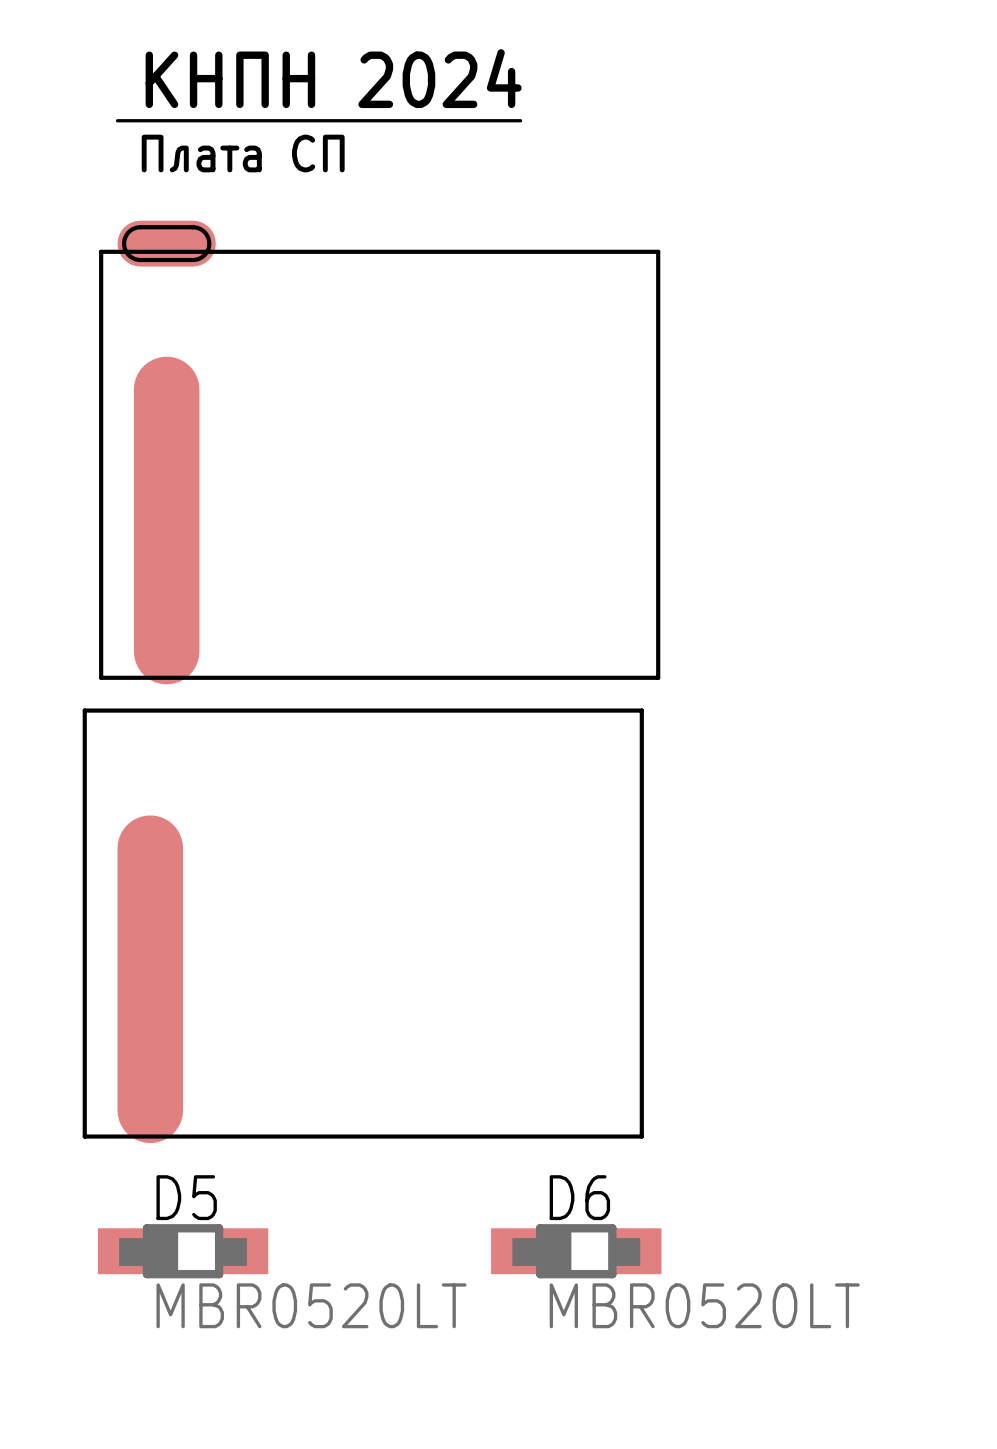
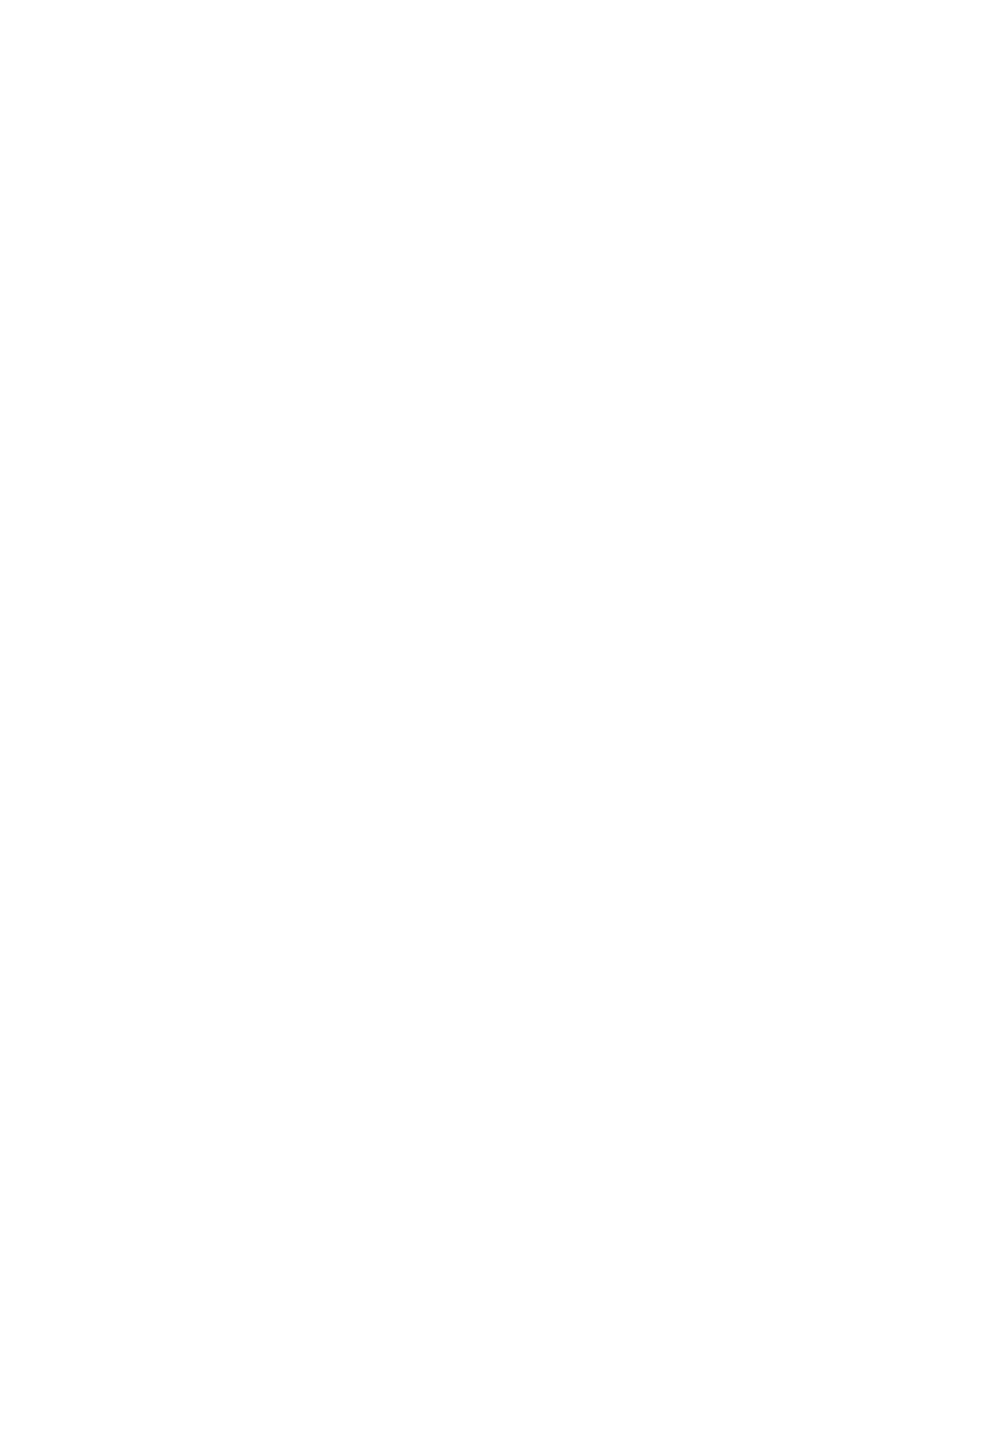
drawing: [115, 119, 523, 123] -> none
part: (379, 452) -> none
part: (363, 925) -> none
D5: MBR0520LT (183, 1251) -> none
D6: MBR0520LT (576, 1251) -> none

